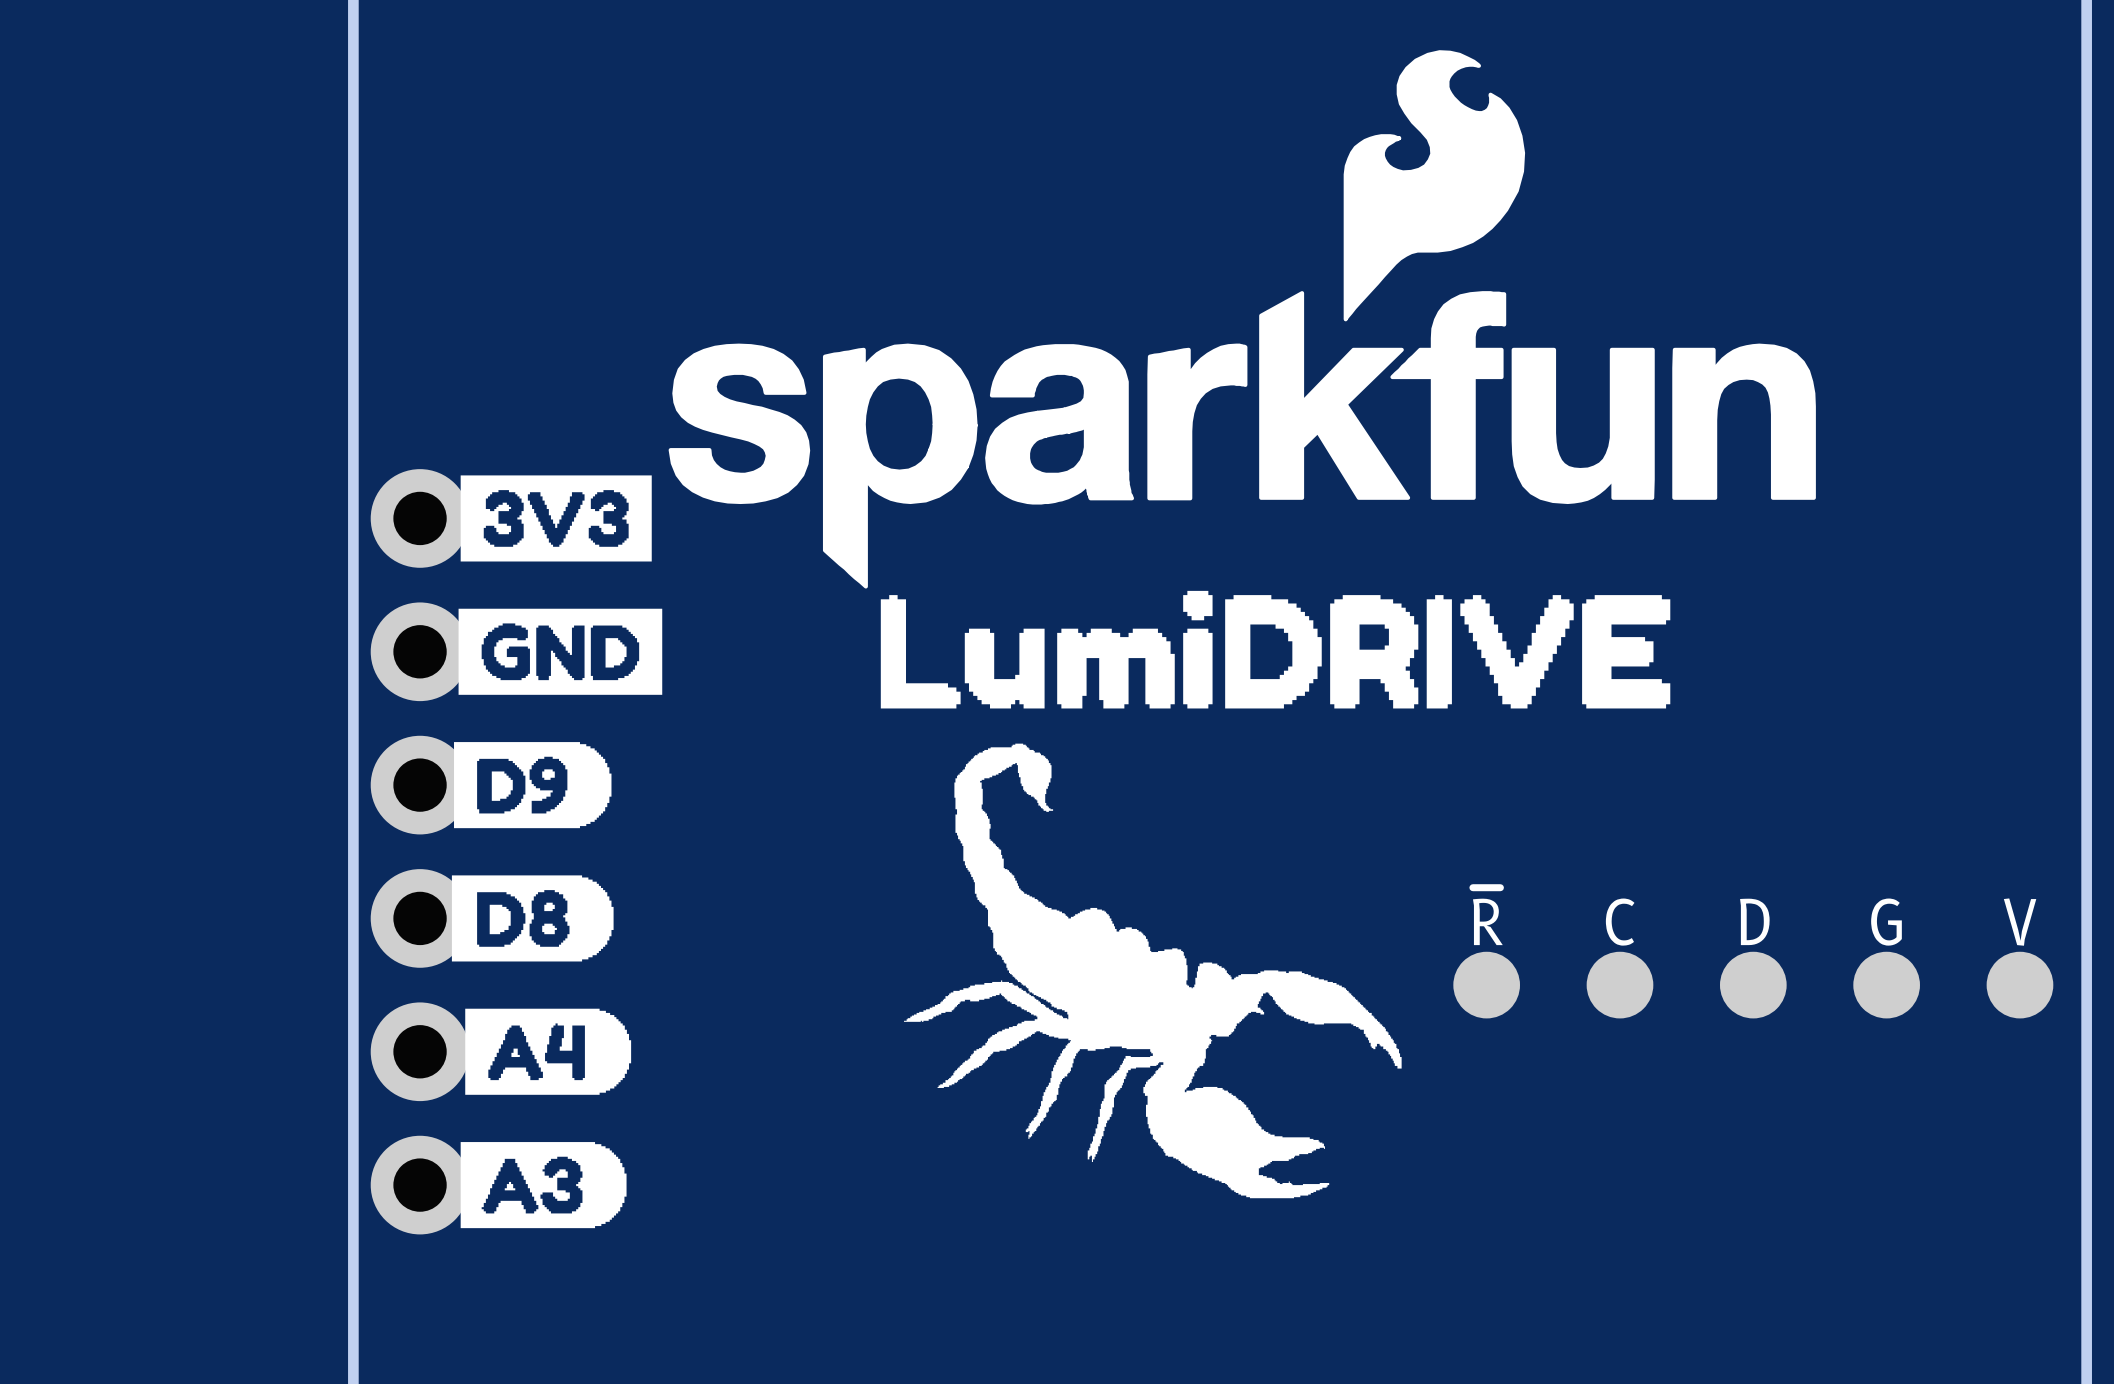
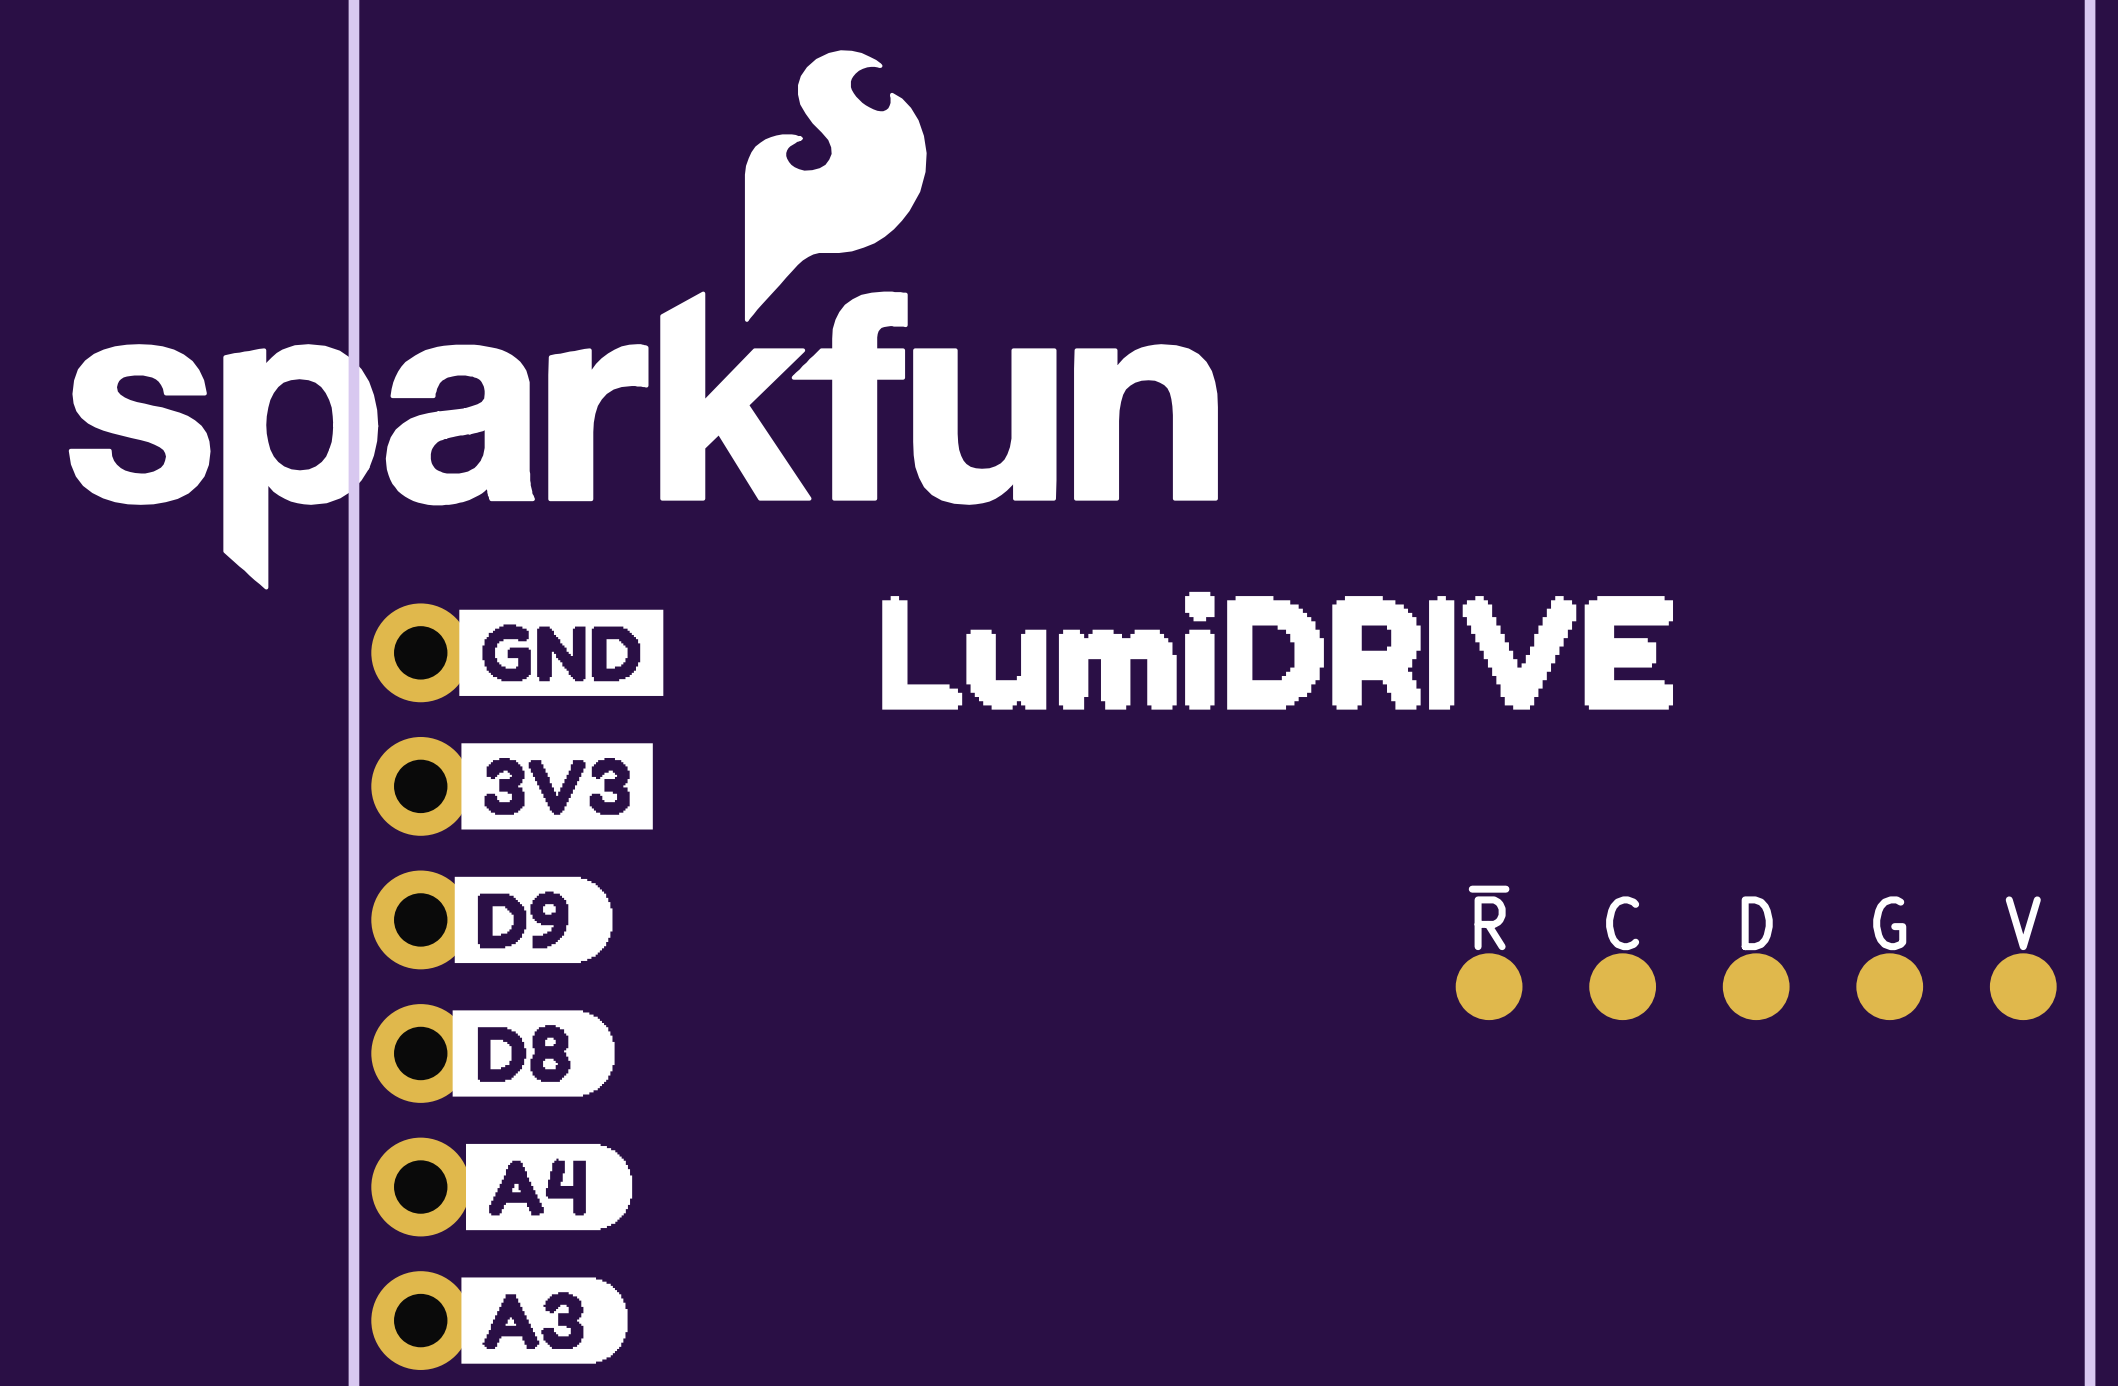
drawing position: (1242, 319) -> (643, 319)
drawing position: (556, 518) -> (557, 786)
drawing: [904, 743, 1402, 1199] -> none
drawing position: (532, 785) -> (533, 919)
part position: (420, 851) -> (420, 986)
drawing position: (532, 918) -> (533, 1053)
drawing position: (548, 1051) -> (549, 1187)
drawing position: (543, 1185) -> (544, 1320)

